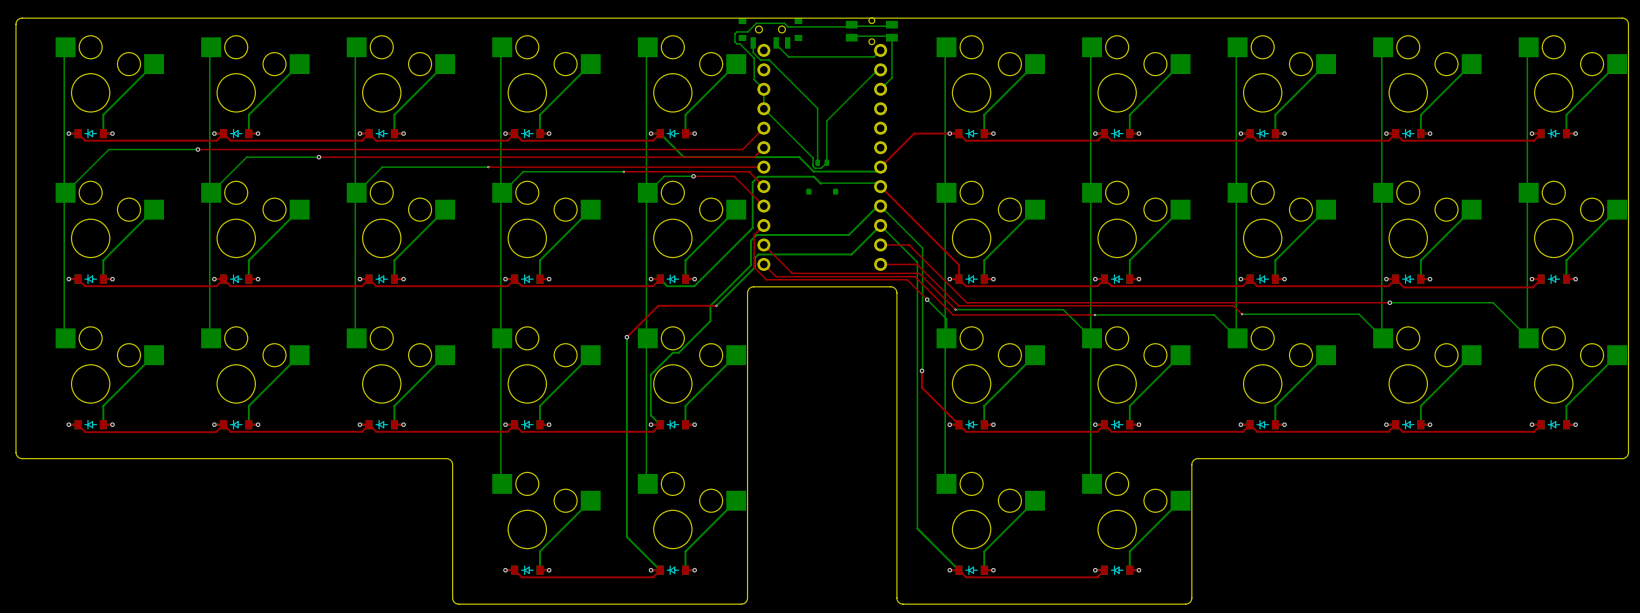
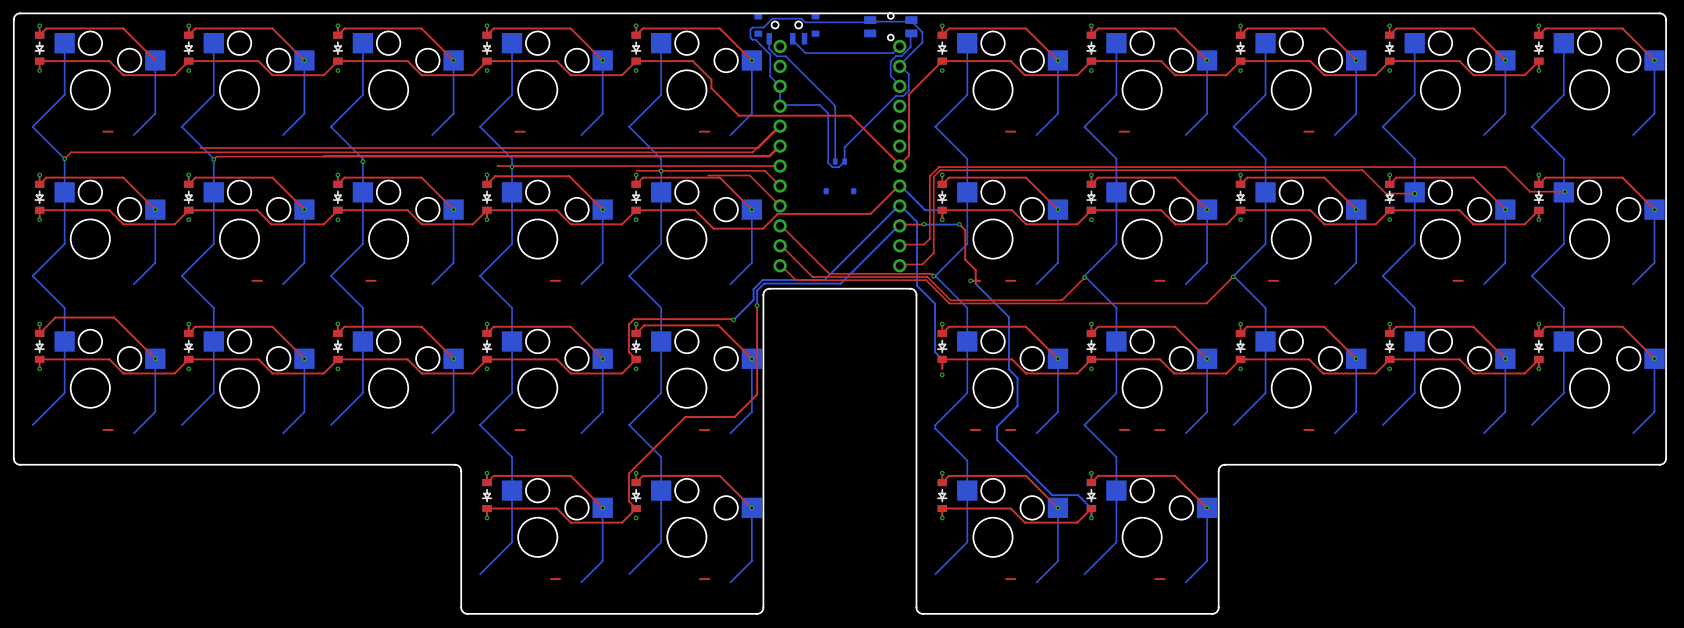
top track: none -> (39, 25) (39, 35) (46, 28) (123, 28) (155, 60)
via: none -> (39, 25)
top track: none -> (188, 25) (188, 35) (195, 28) (272, 28) (304, 60)
via: none -> (188, 25)
top track: none -> (337, 25) (337, 35) (344, 28) (421, 28) (453, 60)
via: none -> (337, 25)
top track: none -> (487, 25) (487, 35) (493, 28) (570, 28) (602, 60)
via: none -> (487, 25)
top track: none -> (636, 25) (636, 35) (642, 28) (719, 28) (751, 60)
via: none -> (636, 25)
top track: none -> (942, 25) (942, 35) (949, 28) (1025, 28) (1057, 60)
via: none -> (942, 25)
top track: none -> (1091, 25) (1091, 35) (1098, 28) (1175, 28) (1207, 60)
via: none -> (1091, 25)
top track: none -> (1240, 25) (1240, 35) (1247, 28) (1324, 28) (1356, 60)
via: none -> (1240, 25)
top track: none -> (1389, 25) (1389, 35) (1396, 28) (1473, 28) (1505, 60)
via: none -> (1389, 25)
top track: none -> (1538, 25) (1538, 35) (1545, 28) (1622, 28) (1654, 60)
via: none -> (1538, 25)
bottom track: (851, 37) (853, 36) (891, 37) (891, 77) (880, 89) -> none
bottom track: none -> (910, 33) (910, 47) (901, 56) (896, 56) (890, 61) (890, 76) (899, 85)
bottom track: (65, 47) (65, 338) -> (64, 43) (64, 94) (32, 126) (64, 158) (64, 243) (32, 275) (64, 307) (64, 393) (32, 425)
bottom track: (211, 47) (211, 338) -> (213, 43) (213, 94) (181, 126) (213, 158) (213, 243) (181, 275) (213, 307) (213, 393) (181, 425)
bottom track: (356, 47) (356, 338) -> (362, 43) (362, 94) (330, 126) (362, 158) (362, 243) (330, 275) (362, 307) (362, 393) (330, 425)
bottom track: (502, 47) (502, 483) -> (512, 43) (512, 94) (480, 126) (512, 158) (512, 243) (480, 275) (512, 307) (512, 393) (480, 425) (512, 457) (512, 542) (480, 574)
bottom track: (647, 47) (647, 483) -> (661, 43) (661, 94) (629, 126) (661, 158) (661, 243) (629, 275) (661, 307) (661, 393) (629, 425) (661, 457) (661, 542) (629, 574)
bottom track: (946, 47) (946, 483) -> (967, 43) (967, 94) (935, 126) (967, 158) (967, 243) (935, 275) (967, 307) (967, 321)
bottom track: (1092, 47) (1092, 483) -> (1116, 43) (1116, 94) (1084, 126) (1116, 158) (1116, 243) (1084, 275)
bottom track: (1237, 47) (1236, 337) -> (1265, 43) (1265, 94) (1233, 126) (1265, 158) (1265, 243) (1233, 275)
bottom track: (1383, 47) (1381, 337) -> (1414, 43) (1414, 94) (1382, 126) (1414, 158) (1414, 243) (1382, 275) (1414, 307) (1414, 393) (1382, 425)
bottom track: (1528, 47) (1527, 337) -> (1563, 43) (1563, 94) (1531, 126) (1563, 158) (1563, 243) (1531, 275) (1563, 307) (1563, 393) (1531, 425)
part: none -> (39, 48)
part: none -> (188, 48)
part: none -> (337, 48)
part: none -> (487, 48)
part: none -> (636, 48)
part: none -> (942, 48)
part: none -> (1091, 48)
part: none -> (1240, 48)
part: none -> (1389, 48)
part: none -> (1538, 48)
bottom track: (154, 64) (103, 114) (103, 133) (112, 133) -> (155, 60) (155, 113) (133, 135)
bottom track: (299, 64) (248, 114) (248, 133) (258, 133) -> (304, 60) (304, 113) (283, 135)
via: none -> (304, 60)
bottom track: (445, 64) (394, 114) (394, 133) (403, 133) -> (453, 60) (453, 113) (432, 135)
via: none -> (453, 60)
bottom track: (590, 64) (539, 114) (539, 133) (549, 133) -> (602, 60) (602, 113) (581, 135)
via: none -> (602, 60)
bottom track: (736, 64) (685, 114) (685, 133) (694, 133) -> (751, 60) (751, 113) (730, 135)
via: none -> (751, 60)
bottom track: (1034, 64) (984, 114) (984, 133) (993, 133) -> (1057, 60) (1057, 113) (1036, 135)
via: none -> (1057, 60)
bottom track: (1180, 64) (1129, 114) (1129, 133) (1138, 133) -> (1207, 60) (1207, 113) (1185, 135)
via: none -> (1207, 60)
bottom track: (1326, 64) (1275, 114) (1275, 133) (1284, 133) -> (1356, 60) (1356, 113) (1334, 135)
via: none -> (1356, 60)
bottom track: (1471, 64) (1420, 114) (1420, 133) (1430, 133) -> (1505, 60) (1505, 113) (1483, 135)
via: none -> (1505, 60)
bottom track: (1617, 64) (1566, 114) (1566, 133) (1575, 133) -> (1654, 60) (1654, 113) (1633, 135)
via: none -> (1654, 60)
bottom track: (880, 67) (826, 120) (826, 148) -> (910, 20) (922, 32) (922, 42) (899, 65) (908, 74) (908, 90) (903, 95) (896, 95) (844, 147)
top track: none -> (39, 70) (39, 61) (109, 61) (123, 75) (174, 75) (188, 61) (258, 61) (272, 75) (323, 75) (337, 61) (407, 61) (421, 75) (472, 75) (487, 61) (556, 61) (570, 75) (622, 75) (636, 61) (692, 61) (711, 79) (711, 88) (738, 115) (850, 115) (899, 164) (908, 155) (908, 94) (942, 61) (1010, 61) (1024, 75) (1077, 75) (1091, 61) (1161, 61) (1175, 75) (1226, 75) (1240, 61) (1310, 61) (1324, 75) (1375, 75) (1389, 61) (1459, 61) (1473, 75) (1524, 75) (1538, 61) (1538, 70)
via: none -> (39, 70)
via: none -> (188, 70)
via: none -> (337, 70)
via: none -> (487, 70)
via: none -> (636, 70)
via: none -> (942, 70)
via: none -> (1091, 70)
via: none -> (1240, 70)
via: none -> (1389, 70)
via: none -> (1538, 70)
bottom track: (763, 107) (813, 157) (813, 166) -> (780, 104) (819, 104) (828, 113) (828, 162) (830, 165)
top track: none -> (780, 124) (752, 152) (71, 152) (64, 158)
top track: (68, 133) (78, 133) (85, 140) (216, 140) (223, 133) -> none
via: (68, 133) -> none
part: (90, 133) -> none
via: (112, 133) -> none
top track: (214, 133) (223, 133) -> none
via: (214, 133) -> none
top track: (223, 133) (230, 140) (362, 140) (369, 133) -> none
part: (236, 133) -> none
top track: (248, 133) (258, 133) -> none
via: (258, 133) -> none
top track: (359, 133) (369, 133) -> none
via: (359, 133) -> none
top track: (369, 133) (376, 140) (507, 140) (514, 133) (521, 140) (653, 140) (660, 133) (651, 133) -> none
part: (381, 133) -> none
top track: (394, 133) (403, 133) -> none
via: (403, 133) -> none
via: (505, 133) -> none
part: (527, 133) -> none
top track: (539, 133) (549, 133) -> none
via: (549, 133) -> none
bottom track: (651, 133) (660, 133) (683, 157) (799, 157) (813, 171) (876, 171) (880, 167) -> none
via: (651, 133) -> none
part: (672, 133) -> none
via: (694, 133) -> none
via: (949, 133) -> none
part: (971, 133) -> none
via: (993, 133) -> none
via: (1095, 133) -> none
part: (1117, 133) -> none
top track: (1129, 133) (1138, 133) -> none
via: (1138, 133) -> none
top track: (1240, 133) (1250, 133) -> none
via: (1240, 133) -> none
top track: (1250, 133) (1257, 140) (1388, 140) (1395, 133) -> none
top track: (1250, 133) (1242, 140) (1111, 140) (1104, 133) (1097, 140) (966, 140) (958, 133) (914, 133) (880, 167) -> none
part: (1262, 133) -> none
via: (1284, 133) -> none
top track: (1386, 133) (1395, 133) -> none
via: (1386, 133) -> none
top track: (1395, 133) (1402, 140) (1534, 140) (1541, 133) (1531, 133) -> none
part: (1408, 133) -> none
top track: (1420, 133) (1430, 133) -> none
via: (1430, 133) -> none
via: (1531, 133) -> none
part: (1553, 133) -> none
top track: (1566, 133) (1575, 133) -> none
via: (1575, 133) -> none
top track: none -> (780, 144) (768, 156) (216, 156) (213, 159)
bottom track: (197, 149) (108, 149) (65, 192) -> none
via: (197, 149) -> none
bottom track: (318, 157) (246, 157) (211, 192) -> none
via: (318, 157) -> none
via: none -> (64, 158)
via: none -> (213, 159)
via: none -> (362, 161)
bottom track: (488, 167) (382, 167) (356, 192) -> none
via: none -> (512, 166)
bottom track: (623, 171) (523, 171) (502, 192) -> none
via: (623, 171) -> none
via: none -> (661, 171)
top track: none -> (39, 174) (39, 184) (46, 177) (123, 177) (155, 209)
via: none -> (39, 174)
top track: none -> (188, 174) (188, 184) (195, 177) (272, 177) (304, 209)
via: none -> (188, 174)
top track: none -> (337, 174) (337, 184) (344, 177) (421, 177) (453, 209)
via: none -> (337, 174)
top track: none -> (487, 174) (487, 184) (495, 176) (569, 176) (602, 209)
via: none -> (487, 174)
top track: none -> (636, 174) (636, 184) (642, 177) (719, 177) (751, 209)
via: none -> (636, 174)
top track: none -> (942, 174) (942, 184) (949, 177) (1025, 177) (1057, 209)
via: none -> (942, 174)
top track: none -> (1091, 174) (1091, 184) (1098, 177) (1175, 177) (1207, 209)
via: none -> (1091, 174)
top track: none -> (1240, 174) (1240, 184) (1247, 177) (1324, 177) (1356, 209)
via: none -> (1240, 174)
top track: none -> (1389, 174) (1389, 184) (1396, 177) (1473, 177) (1505, 209)
via: none -> (1389, 174)
top track: none -> (1538, 174) (1538, 184) (1545, 177) (1622, 177) (1654, 209)
via: none -> (1538, 174)
bottom track: (693, 176) (664, 176) (647, 192) -> none
via: (693, 176) -> none
bottom track: (820, 183) (877, 183) (880, 186) -> none
bottom track: (821, 183) (813, 176) (758, 176) (752, 182) (752, 227) (694, 286) (667, 286) (660, 279) (651, 279) -> none
top track: none -> (899, 184) (870, 213) (777, 213) (763, 228) (713, 228) (695, 210) (636, 210) (622, 224) (570, 224) (556, 210) (487, 210)
bottom track: none -> (899, 184) (925, 210) (942, 210) (942, 219)
top track: (880, 186) (958, 264) (958, 279) (966, 286) (1097, 286) (1104, 279) -> none
top track: none -> (1414, 192) (1385, 193) (1362, 170) (940, 170) (933, 176) (933, 253) (922, 264) (899, 264)
top track: none -> (1564, 191) (1530, 191) (1505, 167) (939, 167) (929, 176) (929, 238) (924, 244) (899, 244)
via: none -> (1564, 191)
via: none -> (1414, 193)
part: none -> (39, 197)
part: none -> (188, 197)
part: none -> (337, 197)
part: none -> (487, 197)
part: none -> (636, 197)
part: none -> (942, 197)
part: none -> (1091, 197)
part: none -> (1240, 197)
part: none -> (1389, 197)
part: none -> (1538, 197)
bottom track: (880, 203) (848, 235) (756, 235) (750, 240) (750, 265) (710, 305) (710, 321) (678, 352) (672, 352) (650, 374) (650, 415) (660, 424) (651, 424) -> none
bottom track: (880, 206) (922, 248) (921, 369) -> none
bottom track: (154, 209) (103, 260) (103, 279) (112, 279) -> (155, 209) (155, 262) (133, 284)
via: none -> (155, 209)
bottom track: (299, 209) (248, 260) (248, 279) (258, 279) -> (304, 209) (304, 262) (283, 284)
via: none -> (304, 209)
bottom track: (445, 209) (394, 260) (394, 279) (403, 279) -> (453, 209) (453, 262) (432, 284)
via: none -> (453, 209)
bottom track: (590, 209) (539, 260) (539, 279) (549, 279) -> (602, 209) (602, 262) (581, 284)
via: none -> (602, 209)
bottom track: (736, 209) (685, 260) (685, 279) (694, 279) -> (751, 209) (751, 262) (730, 284)
via: none -> (751, 209)
bottom track: (1034, 209) (984, 260) (984, 279) (993, 279) -> (1057, 209) (1057, 262) (1036, 284)
via: none -> (1057, 209)
bottom track: (1180, 209) (1129, 260) (1129, 279) (1138, 279) -> (1207, 209) (1207, 262) (1185, 284)
via: none -> (1207, 209)
bottom track: (1326, 209) (1275, 260) (1275, 279) (1284, 279) -> (1356, 209) (1356, 262) (1334, 284)
via: none -> (1356, 209)
bottom track: (1471, 209) (1420, 260) (1420, 279) (1430, 279) -> (1505, 209) (1505, 262) (1483, 284)
via: none -> (1505, 209)
bottom track: (1617, 209) (1566, 260) (1566, 279) (1575, 279) -> (1654, 209) (1654, 262) (1633, 284)
via: none -> (1654, 209)
top track: none -> (487, 210) (487, 219)
top track: none -> (487, 210) (472, 224) (421, 224) (407, 210) (337, 210) (323, 224) (271, 224) (257, 210) (188, 210) (174, 224) (123, 224) (109, 210) (39, 210) (39, 219)
via: none -> (39, 219)
via: none -> (188, 219)
via: none -> (337, 219)
via: none -> (487, 219)
via: none -> (636, 219)
top track: none -> (942, 219) (942, 210) (1012, 210) (1026, 224) (1077, 224) (1091, 210) (1161, 210) (1175, 224) (1226, 224) (1240, 210) (1310, 210) (1324, 224) (1375, 224) (1389, 210) (1459, 210) (1473, 224) (1524, 224) (1538, 210) (1538, 219)
via: none -> (942, 219)
via: none -> (1091, 219)
via: none -> (1240, 219)
via: none -> (1389, 219)
via: none -> (1538, 219)
top track: none -> (924, 224) (899, 224)
bottom track: none -> (924, 224) (959, 224)
via: none -> (924, 224)
top track: none -> (780, 224) (829, 273) (931, 273) (933, 276)
bottom track: none -> (899, 224) (840, 283) (764, 283) (757, 290) (757, 305)
top track: none -> (959, 224) (965, 230) (965, 259) (975, 270) (975, 283)
via: none -> (959, 224)
top track: (763, 225) (754, 235) (754, 267) (766, 279) (907, 279) (927, 299) -> none
top track: none -> (780, 244) (812, 277) (927, 277) (950, 300) (1061, 300) (1084, 277)
top track: (763, 244) (792, 273) (919, 273) (955, 309) -> none
top track: (880, 244) (909, 244) (966, 302) (1389, 302) -> none
top track: none -> (780, 264) (795, 280) (926, 280) (949, 303) (1206, 303) (1233, 276)
top track: (763, 264) (776, 276) (914, 276) (953, 314) (1094, 314) -> none
top track: (880, 264) (917, 264) (958, 305) (1233, 305) (1242, 314) -> none
via: none -> (933, 276)
bottom track: none -> (1084, 275) (1116, 307) (1116, 393) (1084, 425) (1116, 457) (1116, 542) (1084, 574)
bottom track: none -> (1233, 275) (1265, 307) (1265, 393) (1233, 425)
via: none -> (1084, 277)
via: none -> (1233, 276)
top track: (68, 279) (78, 279) (85, 286) (216, 286) (223, 279) -> none
via: (68, 279) -> none
part: (90, 279) -> none
top track: (103, 279) (112, 279) -> none
via: (112, 279) -> none
top track: (214, 279) (223, 279) -> none
via: (214, 279) -> none
top track: (223, 279) (230, 286) (362, 286) (369, 279) (376, 286) (507, 286) (514, 279) -> none
part: (236, 279) -> none
via: (258, 279) -> none
via: (359, 279) -> none
part: (381, 279) -> none
top track: (394, 279) (403, 279) -> none
via: (403, 279) -> none
top track: (505, 279) (514, 279) -> none
via: (505, 279) -> none
top track: (514, 279) (521, 286) (653, 286) (660, 279) (651, 279) -> none
part: (527, 279) -> none
via: (549, 279) -> none
via: (651, 279) -> none
part: (672, 279) -> none
top track: (685, 279) (694, 279) -> none
via: (694, 279) -> none
part: (971, 279) -> none
via: (993, 279) -> none
top track: (1095, 279) (1104, 279) -> none
via: (1095, 279) -> none
top track: (1104, 279) (1111, 286) (1242, 286) (1250, 279) (1257, 286) (1388, 286) (1395, 279) -> none
part: (1117, 279) -> none
via: (1138, 279) -> none
via: (1240, 279) -> none
part: (1262, 279) -> none
top track: (1275, 279) (1284, 279) -> none
via: (1284, 279) -> none
top track: (1386, 279) (1395, 279) -> none
via: (1386, 279) -> none
top track: (1395, 279) (1403, 287) (1532, 287) (1541, 279) (1531, 279) -> none
part: (1408, 279) -> none
via: (1430, 279) -> none
via: (1531, 279) -> none
part: (1553, 279) -> none
top track: (1566, 279) (1575, 279) -> none
via: (1575, 279) -> none
bottom track: none -> (975, 283) (1008, 317) (1008, 369) (1017, 378) (1017, 406) (997, 426) (997, 440) (1052, 495) (1078, 495) (1091, 508) (1091, 517)
bottom track: (927, 299) (946, 319) -> none
via: (927, 299) -> none
bottom track: (1389, 302) (1493, 302) (1528, 338) -> none
via: (1389, 302) -> none
top track: none -> (757, 305) (757, 394) (734, 417) (685, 417) (628, 473) (628, 501) (636, 508) (622, 522) (570, 522) (556, 508) (487, 508) (487, 517)
via: none -> (757, 305)
top track: (716, 305) (658, 305) (626, 337) -> none
bottom track: (716, 305) (754, 267) (754, 257) (758, 254) (851, 254) (880, 225) (917, 262) (917, 528) (927, 538) -> none
via: (716, 305) -> none
bottom track: (955, 309) (1063, 309) (1092, 338) -> none
via: (955, 309) -> none
bottom track: (1094, 314) (1214, 314) (1237, 338) -> none
via: (1094, 314) -> none
bottom track: (1242, 314) (1359, 314) (1383, 338) -> none
via: (1242, 314) -> none
top track: none -> (733, 319) (634, 319) (628, 324) (628, 352) (636, 359) (622, 373) (570, 373) (556, 359) (487, 359) (472, 373) (421, 373) (407, 359) (337, 359) (323, 373) (272, 373) (258, 359) (188, 359) (174, 373) (123, 373) (109, 359) (39, 359) (39, 368)
bottom track: none -> (733, 319) (753, 299) (753, 289) (762, 280) (824, 280) (899, 204) (917, 221) (917, 285) (935, 303) (935, 352) (942, 359) (942, 368)
via: none -> (733, 319)
top track: none -> (39, 324) (39, 333) (55, 317) (114, 317) (155, 358)
via: none -> (39, 324)
top track: none -> (188, 324) (188, 333) (195, 326) (272, 326) (304, 358)
via: none -> (188, 324)
top track: none -> (337, 324) (337, 333) (344, 326) (421, 326) (453, 358)
via: none -> (337, 324)
top track: none -> (487, 324) (487, 333) (493, 326) (570, 326) (602, 358)
via: none -> (487, 324)
top track: none -> (636, 324) (636, 333) (644, 325) (718, 325) (751, 358)
via: none -> (636, 324)
top track: none -> (942, 324) (942, 333) (949, 326) (1025, 326) (1057, 358)
via: none -> (942, 324)
top track: none -> (1091, 324) (1091, 333) (1098, 326) (1175, 326) (1207, 358)
via: none -> (1091, 324)
top track: none -> (1240, 324) (1240, 333) (1247, 326) (1324, 326) (1356, 358)
via: none -> (1240, 324)
top track: none -> (1389, 324) (1389, 333) (1396, 326) (1473, 326) (1505, 358)
via: none -> (1389, 324)
top track: none -> (1538, 324) (1538, 333) (1545, 326) (1622, 326) (1654, 358)
via: none -> (1538, 324)
bottom track: (626, 337) (626, 536) (660, 570) (651, 570) -> none
via: (626, 337) -> none
bottom track: none -> (967, 341) (967, 393) (935, 425) (935, 428) (967, 460) (967, 542) (935, 574)
part: none -> (39, 346)
part: none -> (188, 346)
part: none -> (337, 346)
part: none -> (487, 346)
part: none -> (636, 346)
part: none -> (942, 346)
part: none -> (1091, 346)
part: none -> (1240, 346)
part: none -> (1389, 346)
part: none -> (1538, 346)
bottom track: (154, 355) (103, 405) (103, 424) (112, 424) -> (155, 358) (155, 411) (133, 433)
via: none -> (155, 358)
bottom track: (299, 355) (248, 405) (248, 424) (258, 424) -> (304, 358) (304, 411) (283, 433)
via: none -> (304, 358)
bottom track: (445, 355) (394, 405) (394, 424) (403, 424) -> (453, 358) (453, 411) (432, 433)
via: none -> (453, 358)
bottom track: (590, 355) (539, 405) (539, 424) (549, 424) -> (602, 358) (602, 411) (581, 433)
via: none -> (602, 358)
bottom track: (736, 355) (685, 405) (685, 424) (694, 424) -> (751, 358) (751, 411) (730, 433)
via: none -> (751, 358)
bottom track: (1034, 355) (984, 405) (984, 424) (993, 424) -> (1057, 358) (1057, 411) (1036, 433)
via: none -> (1057, 358)
bottom track: (1180, 355) (1129, 405) (1129, 424) (1138, 424) -> (1207, 358) (1207, 411) (1185, 433)
via: none -> (1207, 358)
bottom track: (1326, 355) (1275, 405) (1275, 424) (1284, 424) -> (1356, 358) (1356, 411) (1334, 433)
via: none -> (1356, 358)
bottom track: (1471, 355) (1420, 405) (1420, 424) (1430, 424) -> (1505, 358) (1505, 411) (1483, 433)
via: none -> (1505, 358)
bottom track: (1617, 355) (1566, 405) (1566, 424) (1575, 424) -> (1654, 358) (1654, 411) (1633, 433)
via: none -> (1654, 358)
via: none -> (39, 368)
via: none -> (188, 368)
via: none -> (337, 368)
via: none -> (487, 368)
via: none -> (636, 368)
top track: none -> (942, 368) (942, 359) (1012, 359) (1026, 373) (1077, 373) (1091, 359) (1159, 359) (1174, 373) (1226, 373) (1240, 359) (1309, 359) (1323, 373) (1375, 373) (1389, 359) (1459, 359) (1473, 373) (1524, 373) (1538, 359) (1538, 368)
via: none -> (1091, 368)
via: none -> (1240, 368)
via: none -> (1389, 368)
via: none -> (1538, 368)
top track: (923, 370) (922, 387) (966, 431) (1097, 431) (1104, 424) (1111, 431) (1242, 431) (1250, 424) -> none
top track: (68, 424) (78, 424) (85, 432) (216, 432) (223, 424) -> none
via: (68, 424) -> none
part: (90, 424) -> none
via: (112, 424) -> none
top track: (214, 424) (223, 424) -> none
via: (214, 424) -> none
top track: (223, 424) (230, 431) (362, 431) (369, 424) -> none
part: (236, 424) -> none
top track: (248, 424) (258, 424) -> none
via: (258, 424) -> none
top track: (359, 424) (369, 424) -> none
via: (359, 424) -> none
top track: (369, 424) (376, 431) (507, 431) (514, 424) (521, 431) (653, 431) (660, 424) (651, 424) -> none
part: (381, 424) -> none
top track: (394, 424) (403, 424) -> none
via: (403, 424) -> none
via: (505, 424) -> none
part: (527, 424) -> none
top track: (539, 424) (549, 424) -> none
via: (549, 424) -> none
via: (651, 424) -> none
part: (672, 424) -> none
via: (694, 424) -> none
via: (949, 424) -> none
part: (971, 424) -> none
via: (993, 424) -> none
via: (1095, 424) -> none
part: (1117, 424) -> none
via: (1138, 424) -> none
top track: (1240, 424) (1250, 424) -> none
via: (1240, 424) -> none
top track: (1250, 424) (1257, 431) (1388, 431) (1395, 424) -> none
part: (1262, 424) -> none
via: (1284, 424) -> none
top track: (1386, 424) (1395, 424) -> none
via: (1386, 424) -> none
top track: (1395, 424) (1402, 431) (1534, 431) (1541, 424) (1531, 424) -> none
part: (1408, 424) -> none
top track: (1420, 424) (1430, 424) -> none
via: (1430, 424) -> none
via: (1531, 424) -> none
part: (1553, 424) -> none
top track: (1566, 424) (1575, 424) -> none
via: (1575, 424) -> none
top track: none -> (487, 473) (487, 482) (493, 475) (570, 475) (602, 507)
via: none -> (487, 473)
top track: none -> (636, 473) (636, 482) (642, 475) (719, 475) (751, 507)
via: none -> (636, 473)
top track: none -> (942, 473) (942, 482) (949, 475) (1025, 475) (1057, 507)
via: none -> (942, 473)
top track: none -> (1091, 473) (1091, 482) (1098, 475) (1175, 475) (1207, 507)
via: none -> (1091, 473)
part: none -> (487, 495)
part: none -> (636, 495)
part: none -> (942, 495)
part: none -> (1091, 495)
bottom track: (590, 500) (539, 551) (539, 570) (549, 570) -> (602, 507) (602, 561) (581, 582)
via: none -> (602, 507)
bottom track: (736, 500) (685, 551) (685, 570) (694, 570) -> (751, 507) (751, 561) (730, 582)
via: none -> (751, 507)
bottom track: (1034, 500) (984, 551) (984, 570) (993, 570) -> (1057, 507) (1057, 561) (1036, 582)
via: none -> (1057, 507)
bottom track: (1180, 500) (1129, 551) (1129, 570) (1138, 570) -> (1207, 507) (1207, 561) (1185, 582)
via: none -> (1207, 507)
via: none -> (487, 517)
via: none -> (636, 517)
top track: none -> (942, 517) (942, 508) (1010, 508) (1024, 522) (1077, 522) (1091, 508) (1091, 517)
via: none -> (942, 517)
via: none -> (1091, 517)
bottom track: (917, 528) (958, 570) (949, 570) -> none
top track: (505, 570) (514, 570) (521, 577) (653, 577) (660, 570) (651, 570) -> none
via: (505, 570) -> none
part: (527, 570) -> none
via: (549, 570) -> none
via: (651, 570) -> none
part: (672, 570) -> none
via: (694, 570) -> none
top track: (949, 570) (958, 570) (966, 577) (1097, 577) (1104, 570) (1095, 570) -> none
via: (949, 570) -> none
part: (971, 570) -> none
via: (993, 570) -> none
via: (1095, 570) -> none
part: (1117, 570) -> none
via: (1138, 570) -> none

